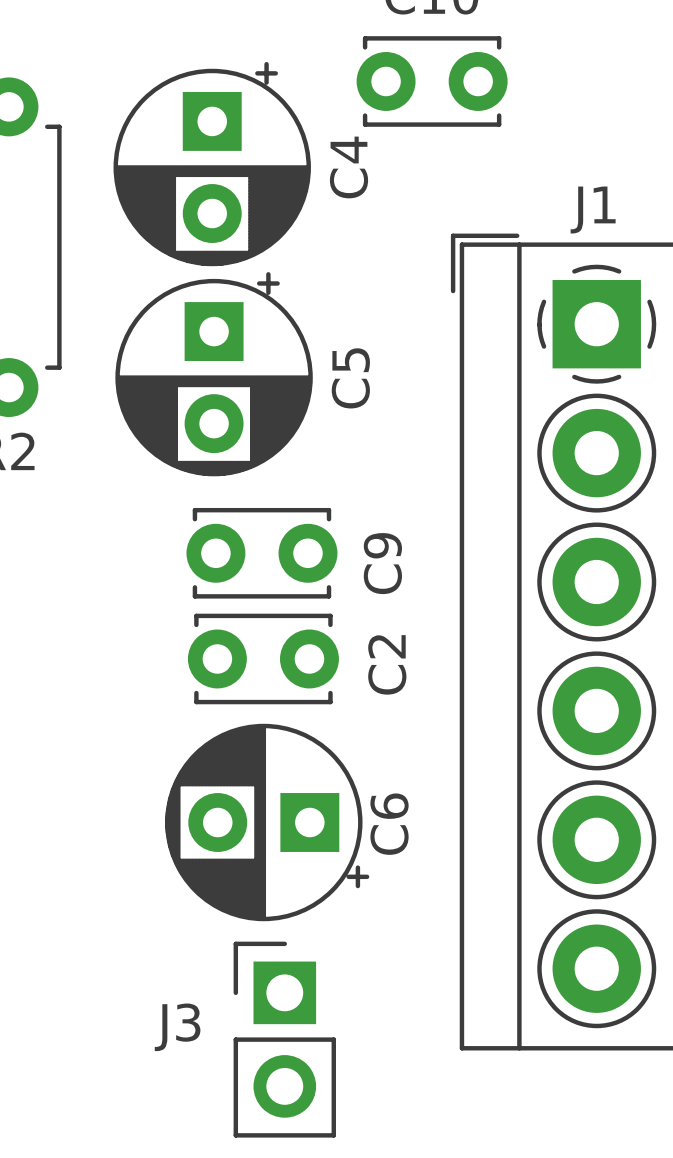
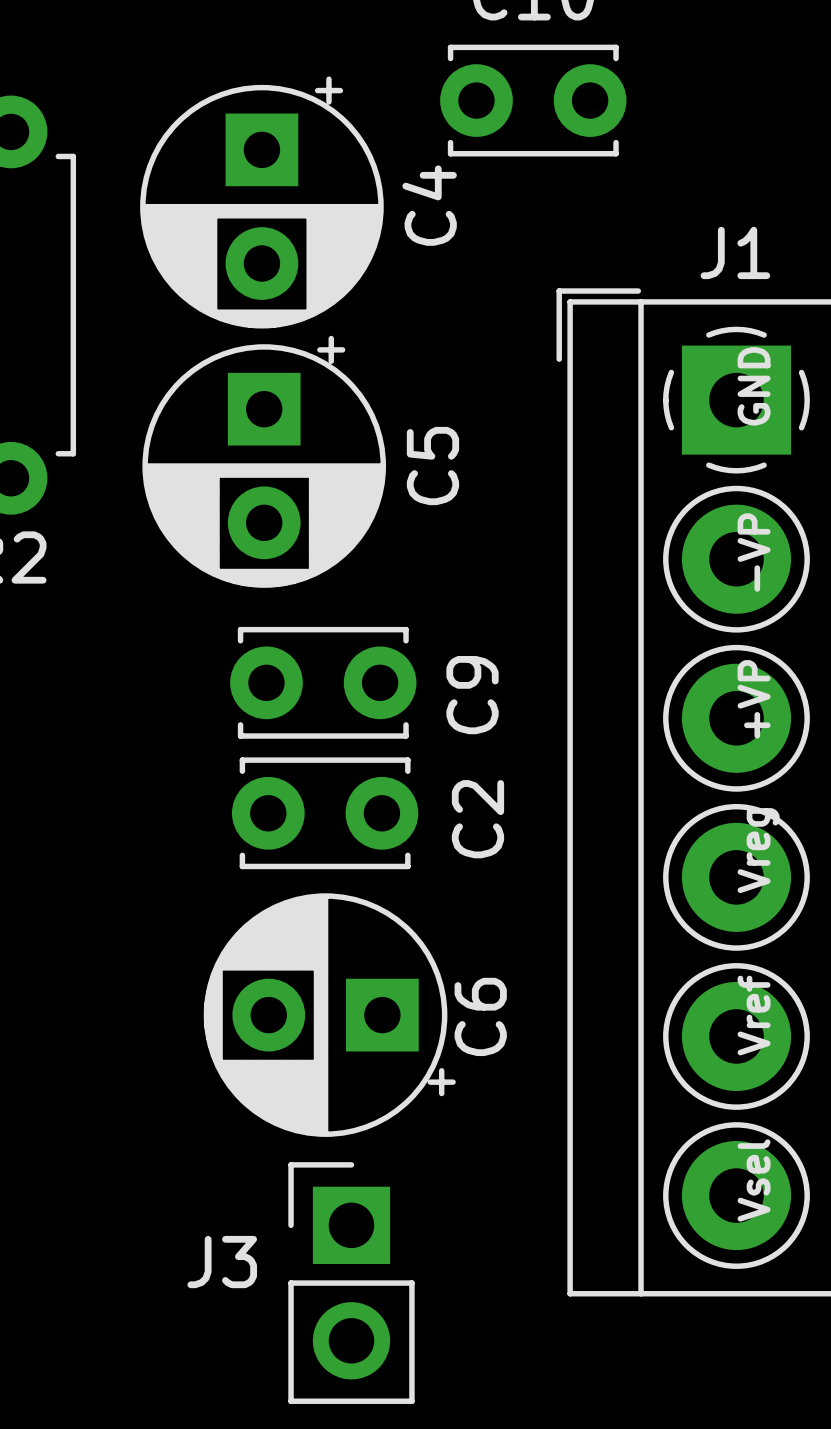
text: none -> Vsel Vref Vreg +VP -VP GND (758, 784)

